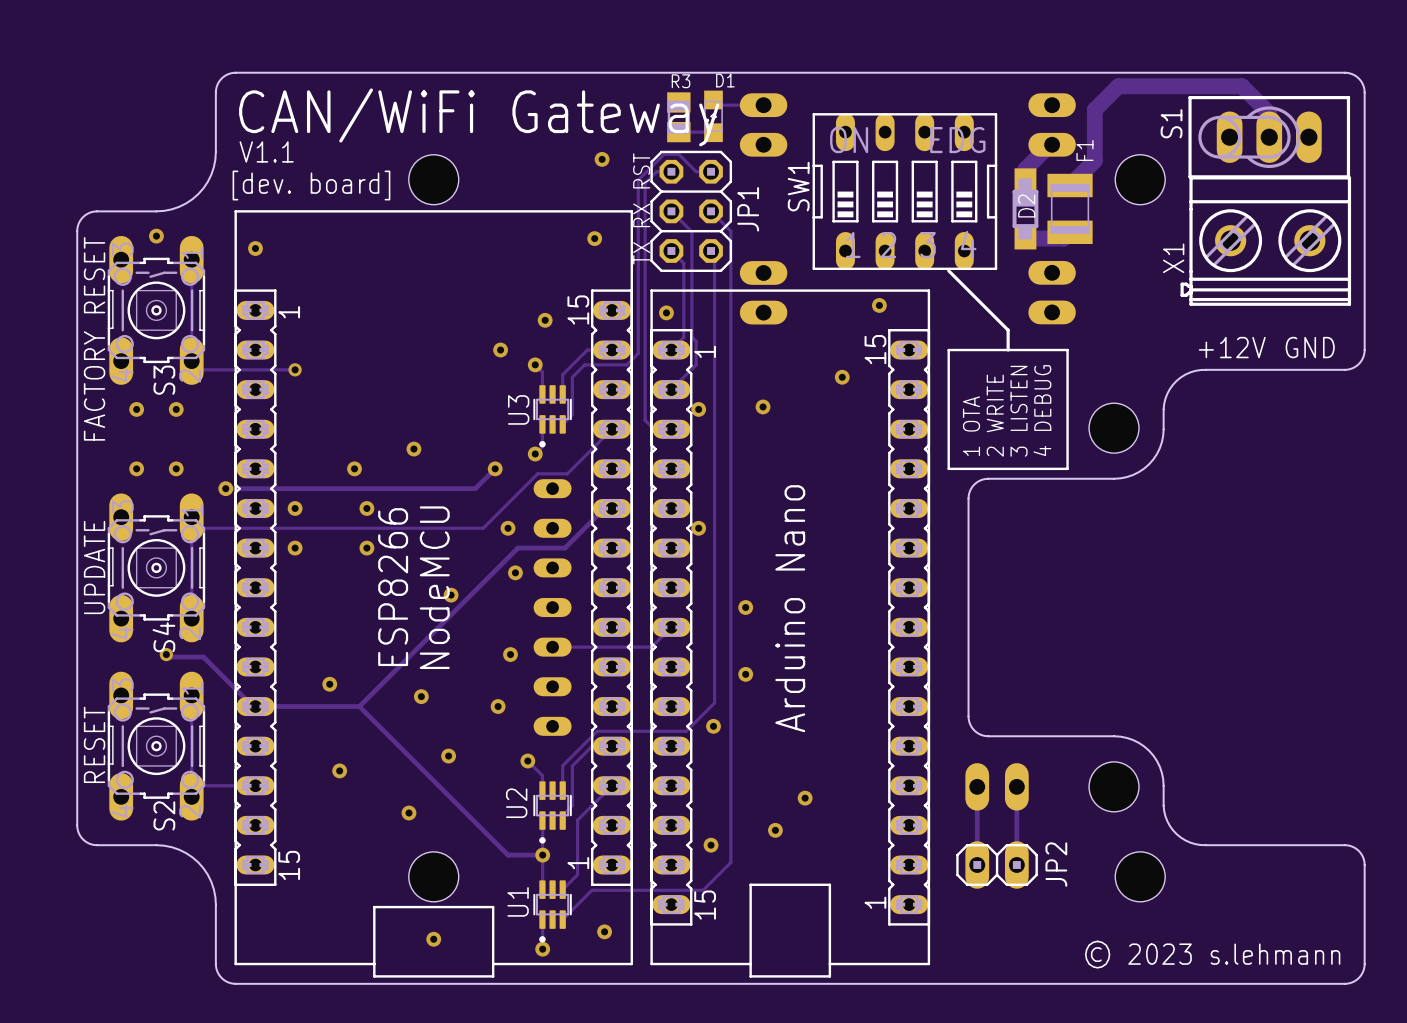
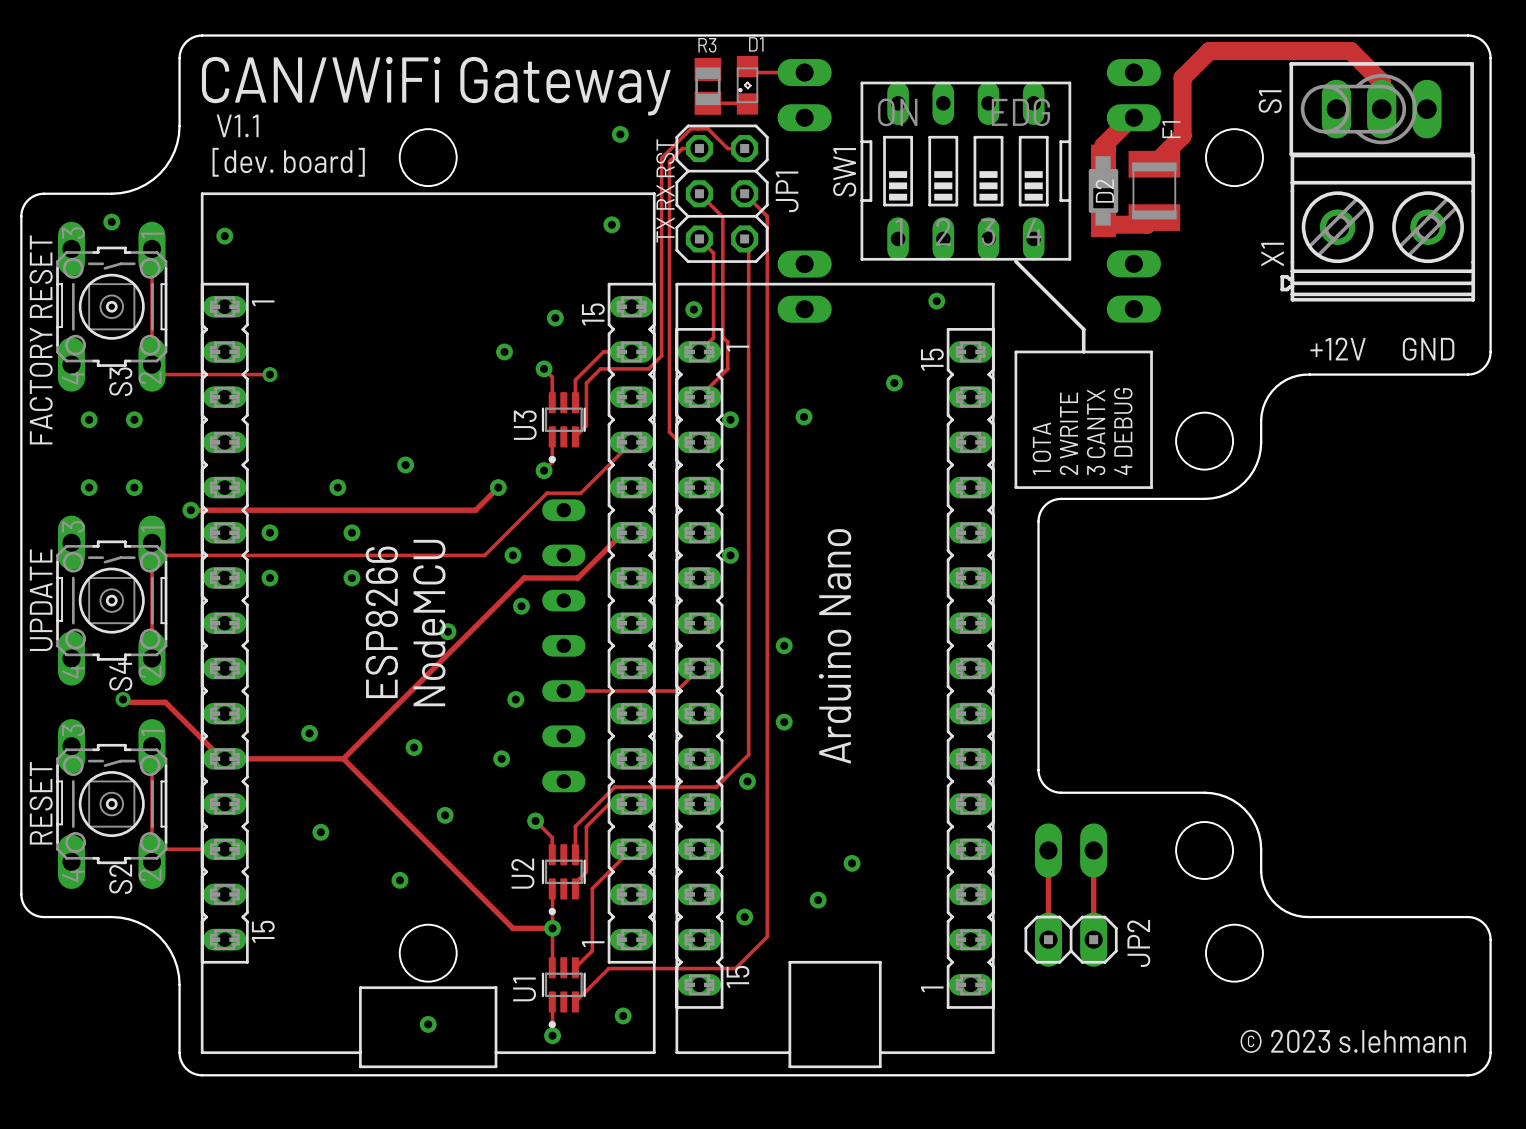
text: 3 LISTEN (1019, 411) -> 3 CANTX (1096, 432)

